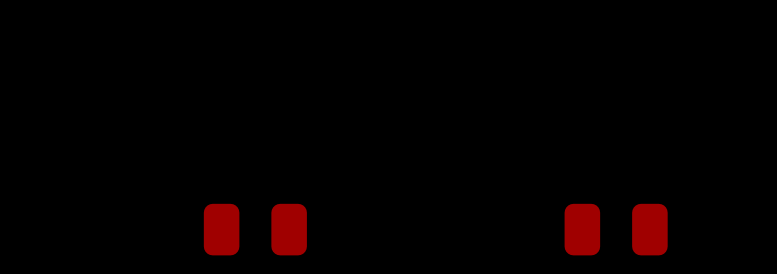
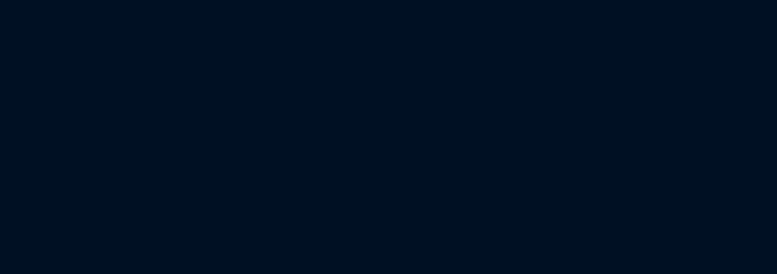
part: (255, 229) -> none
part: (616, 229) -> none

